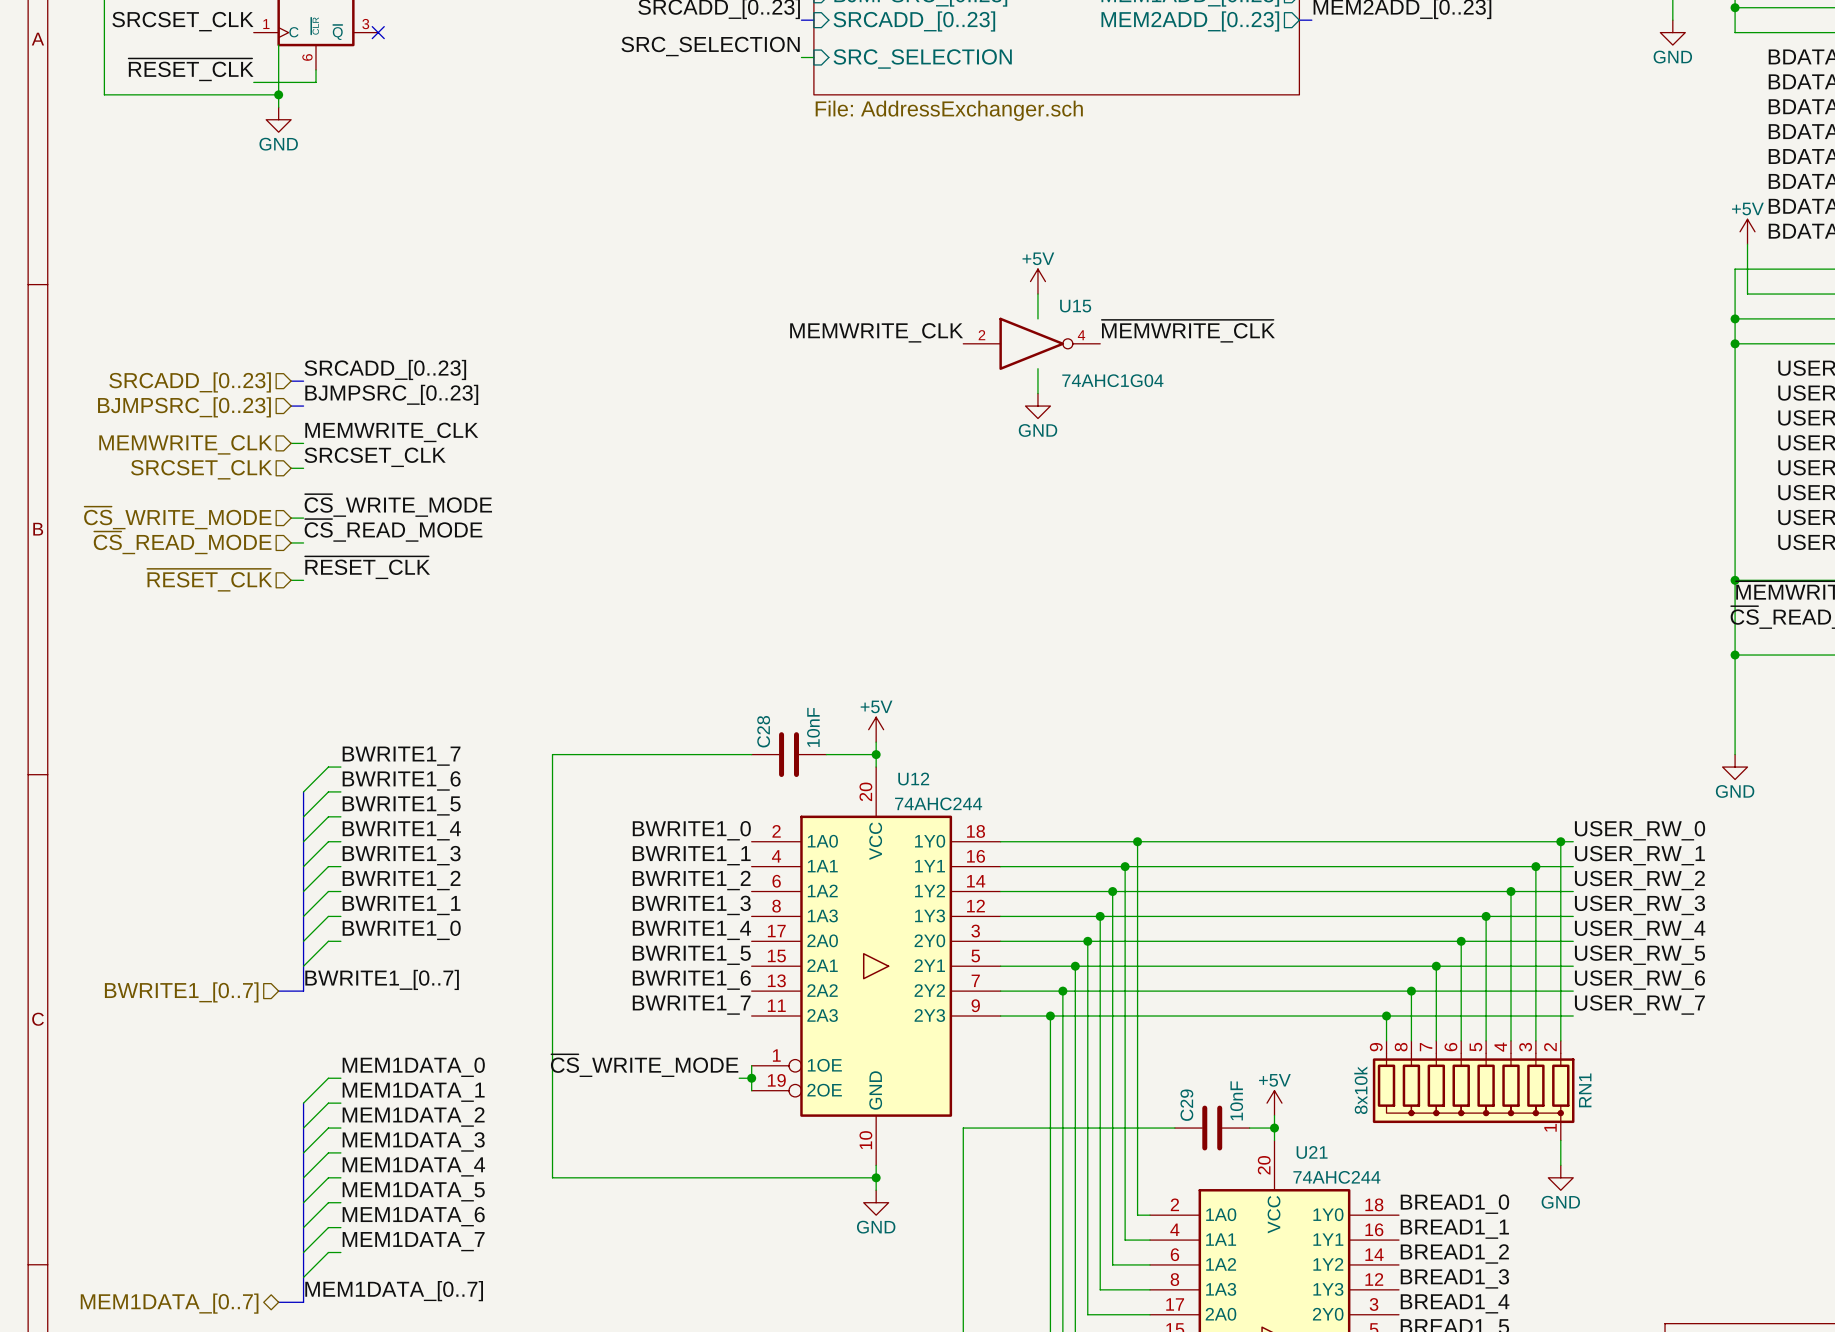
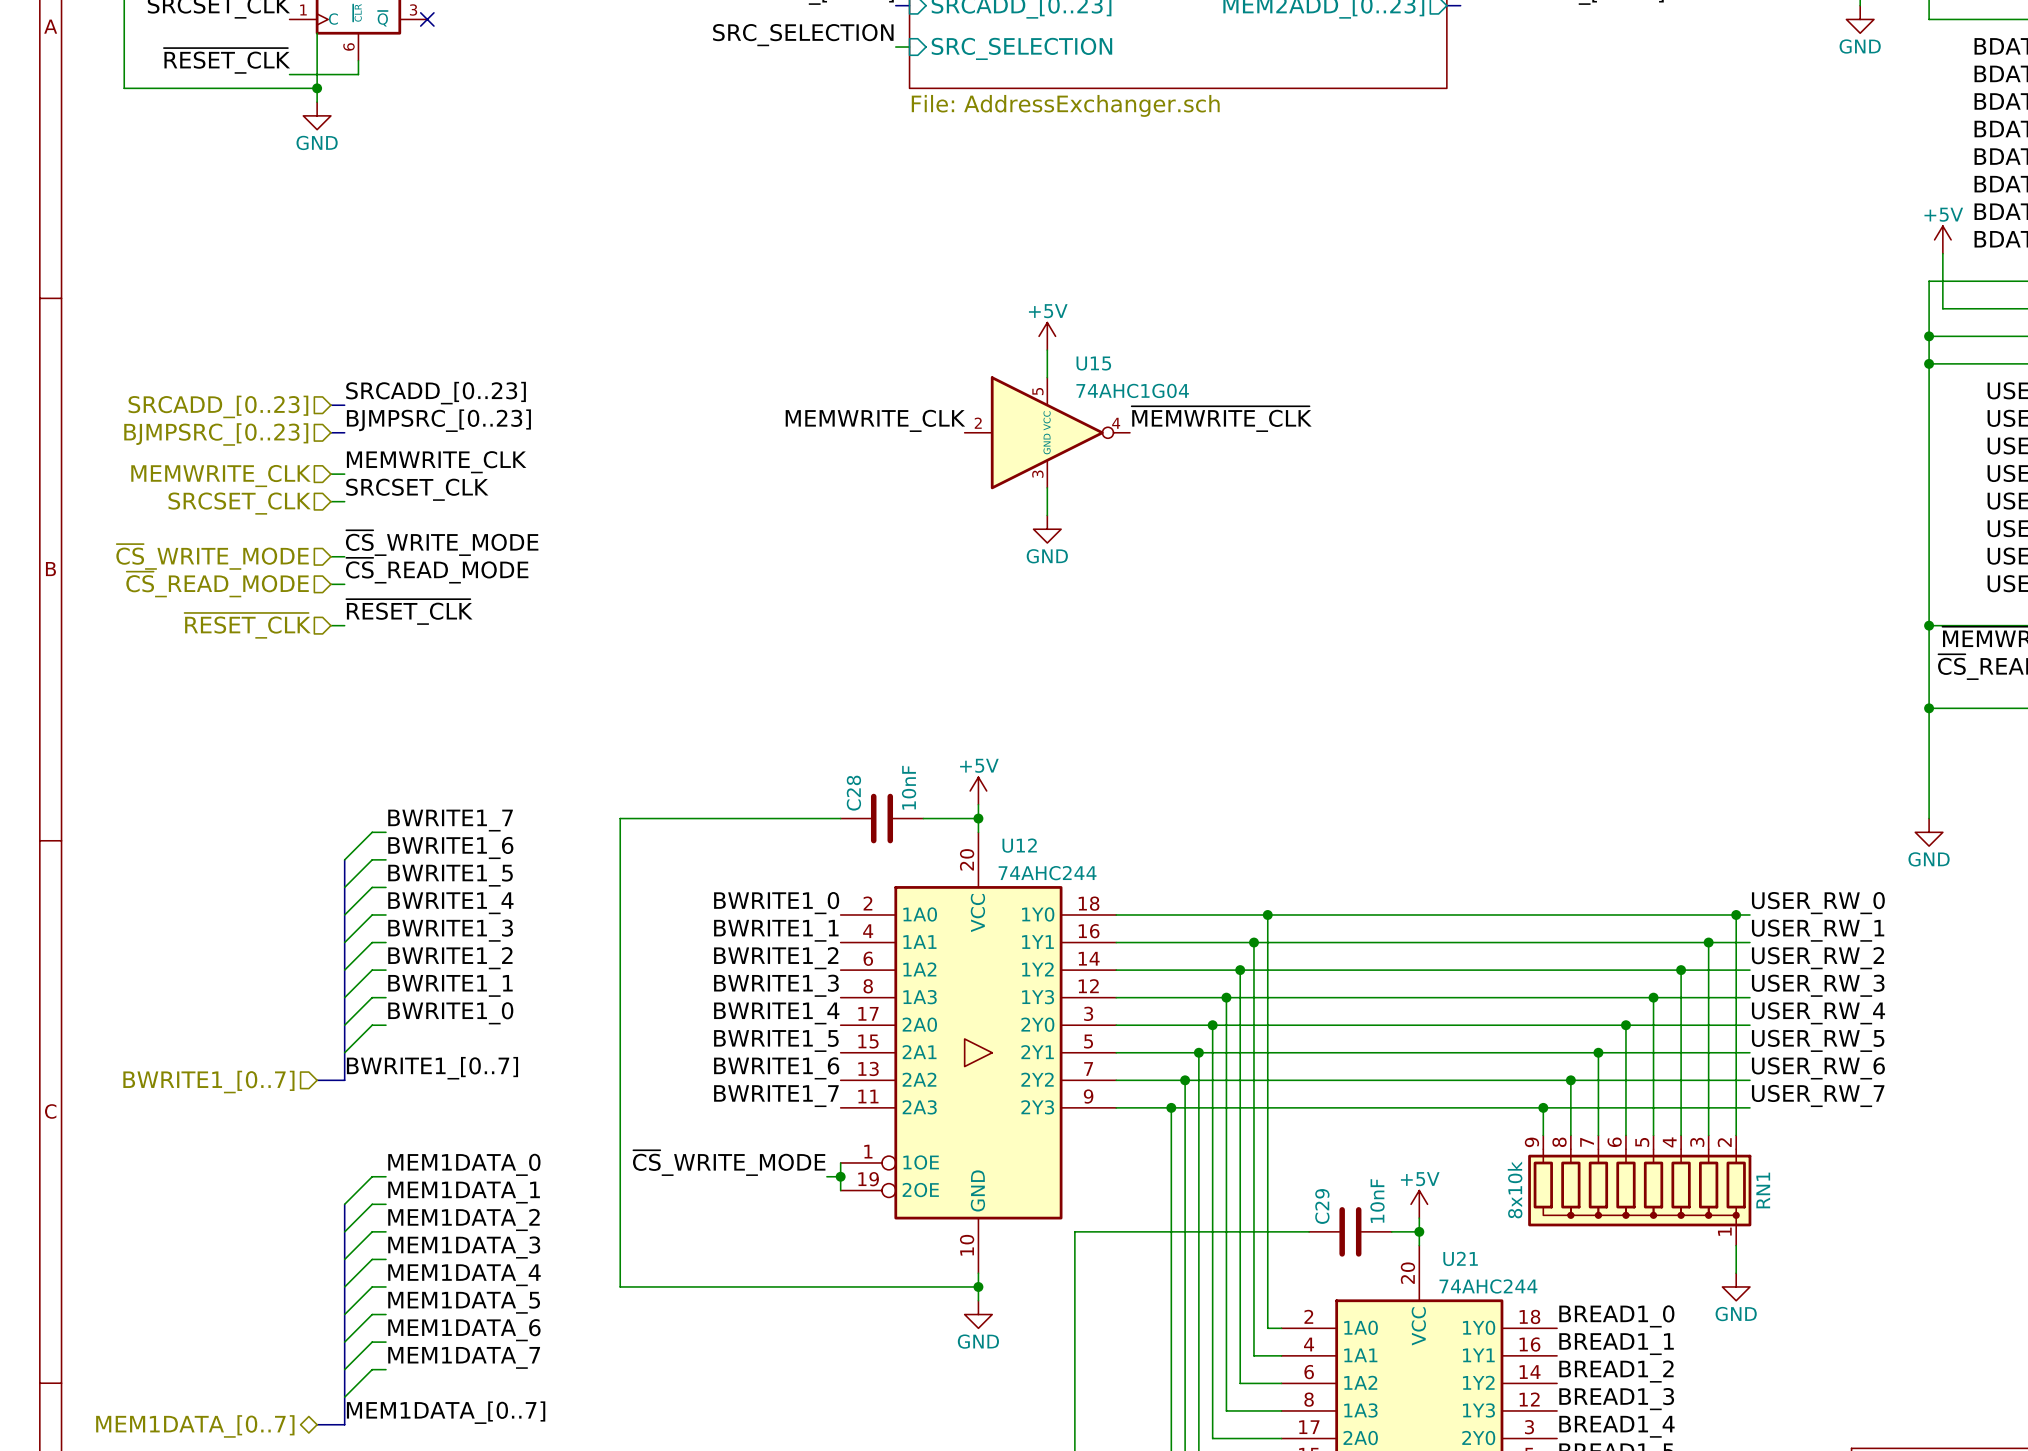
power symbol position: +5V (1037, 281) -> +5V (1047, 336)
wire: (1037, 294) (1037, 318) -> (1047, 350) (1047, 377)
U15 name position: U15 (1075, 306) -> U15 (1093, 363)
U15 symbol: [963, 317, 1101, 370] -> [964, 376, 1130, 490]
label position: ~{MEMWRITE_CLK} (1188, 331) -> ~{MEMWRITE_CLK} (1221, 419)
label position: MEMWRITE_CLK (876, 332) -> MEMWRITE_CLK (875, 420)
wire: (1037, 368) (1037, 393) -> (1047, 487) (1047, 515)
U15 value position: 74AHC1G04 (1112, 380) -> 74AHC1G04 (1132, 390)
power symbol position: GND (1037, 406) -> GND (1047, 529)

